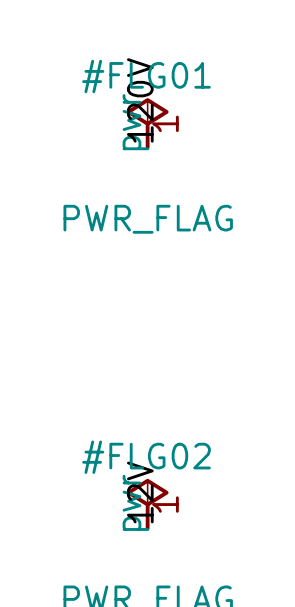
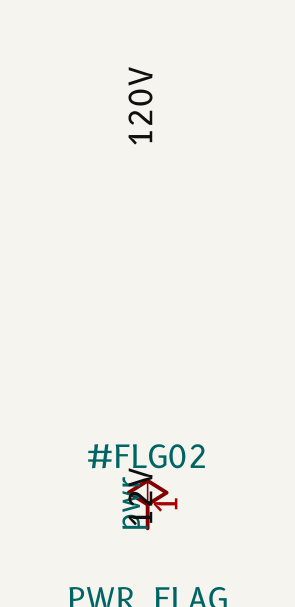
#FLG01: PWR_FLAG (147, 123) -> none

